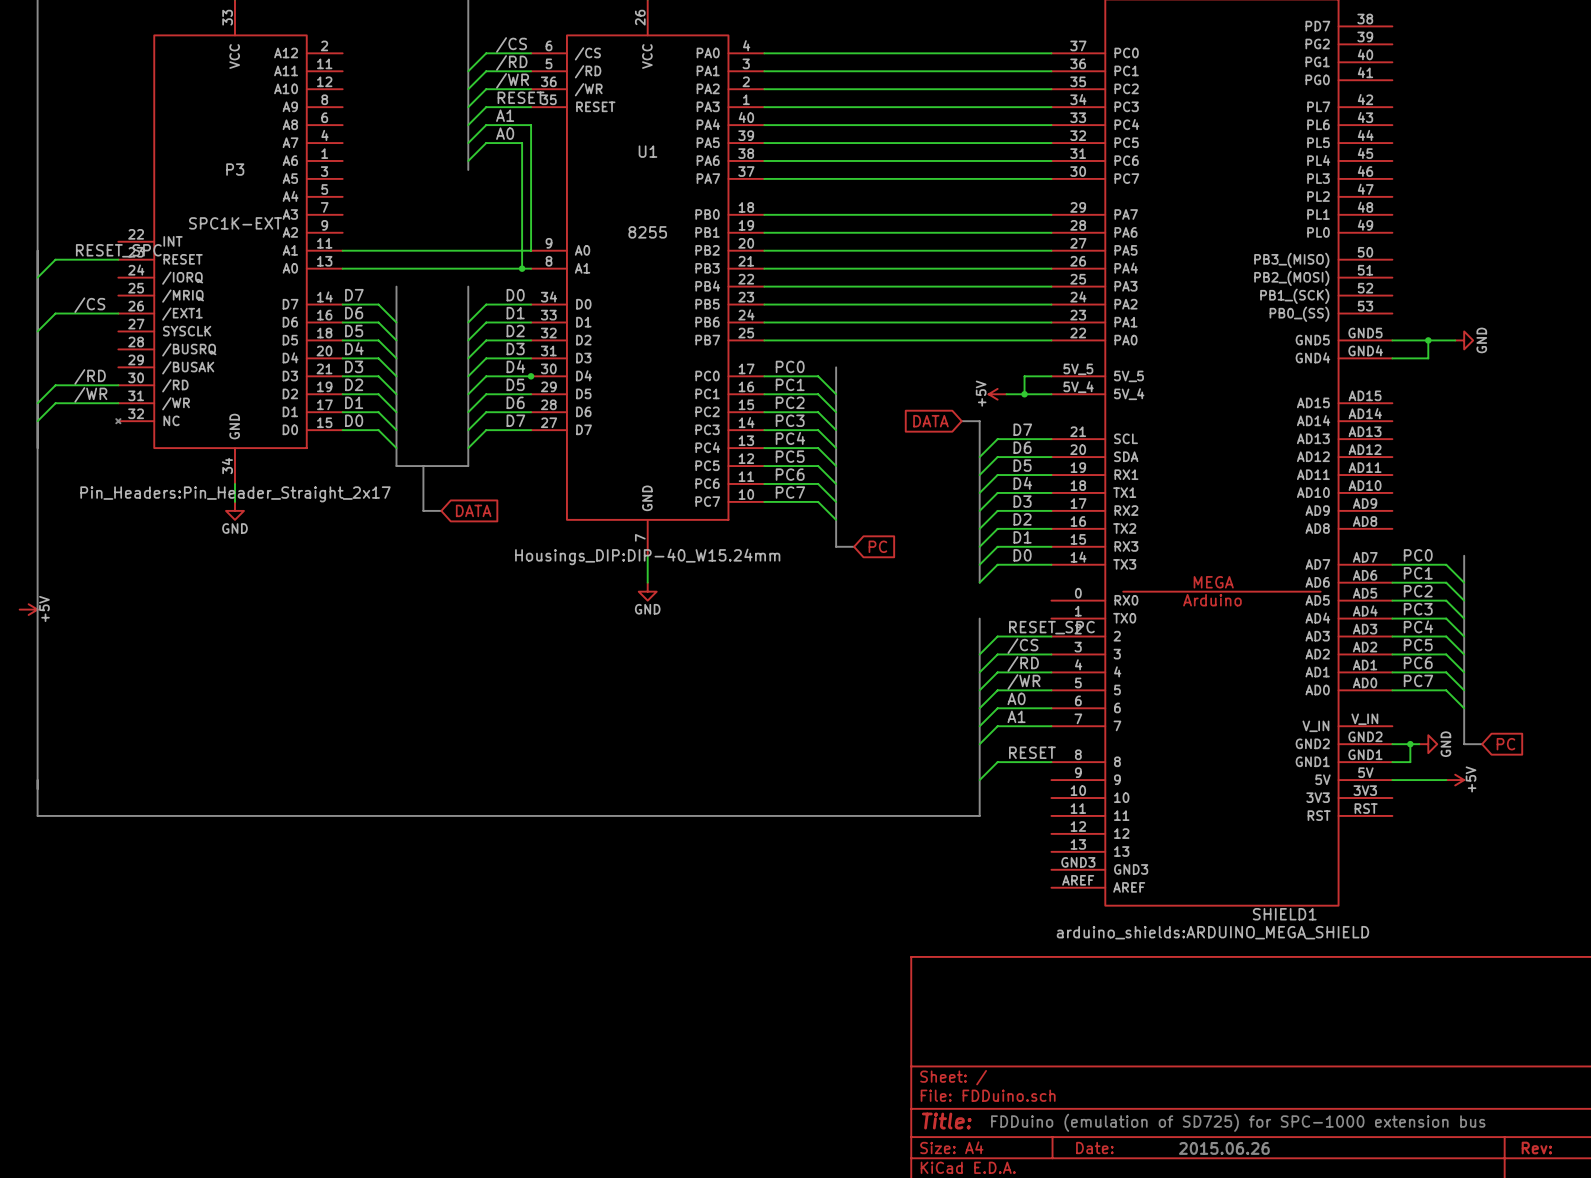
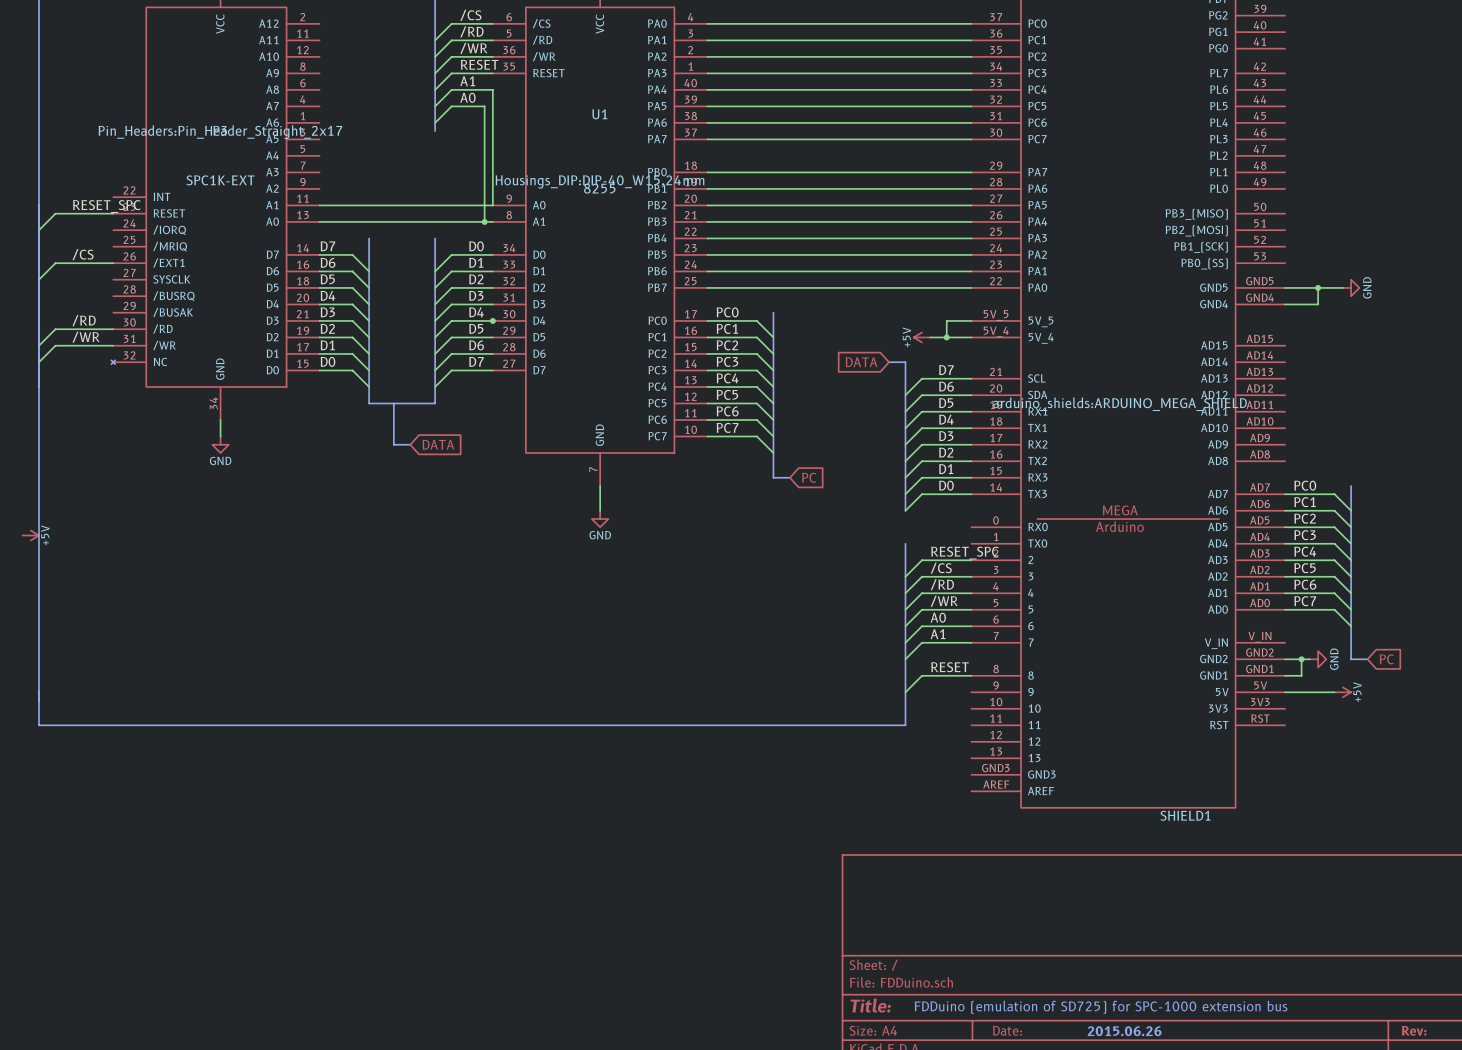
P3 text position: Pin_Headers:Pin_Header_Straight_2x17 (235, 494) -> Pin_Headers:Pin_Header_Straight_2x17 (220, 132)
U1 text position: Housings_DIP:DIP-40_W15.24mm (647, 556) -> Housings_DIP:DIP-40_W15.24mm (599, 181)
SHIELD1 text position: arduino_shields:ARDUINO_MEGA_SHIELD (1212, 932) -> arduino_shields:ARDUINO_MEGA_SHIELD (1120, 404)

